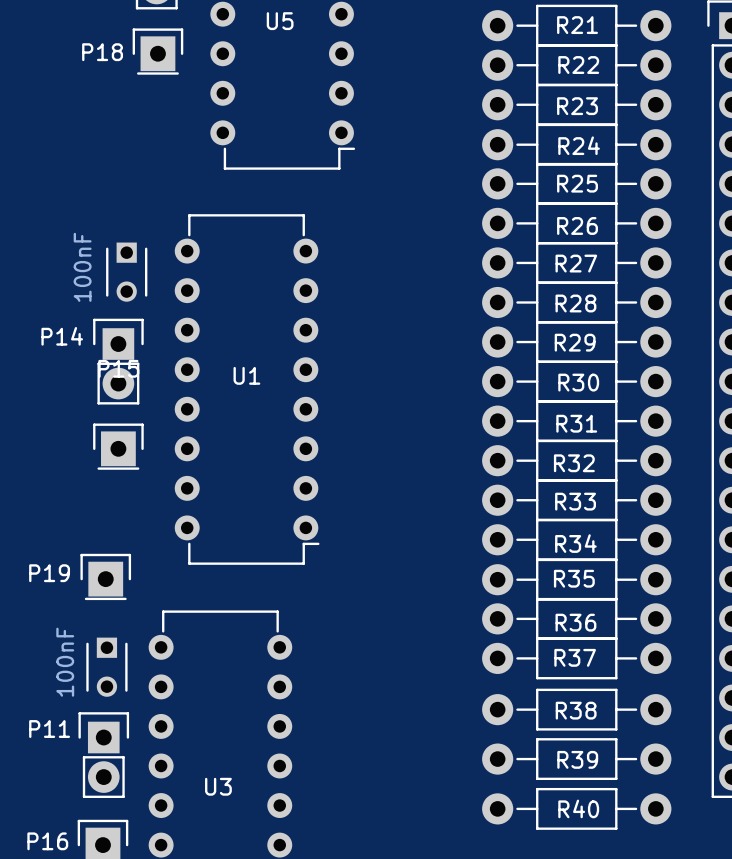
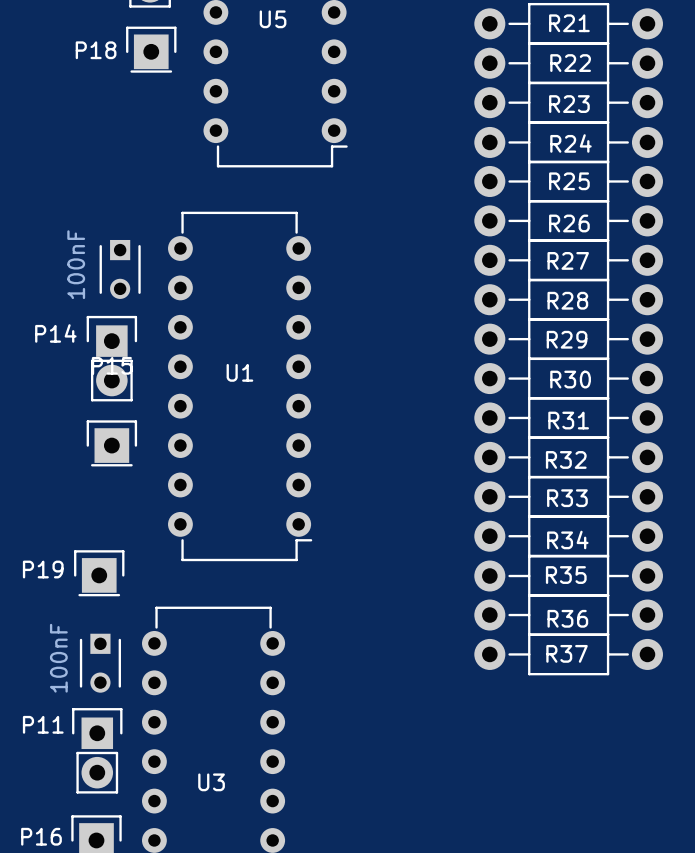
R38: (576, 709) -> none
R39: (576, 759) -> none
R40: (576, 808) -> none

